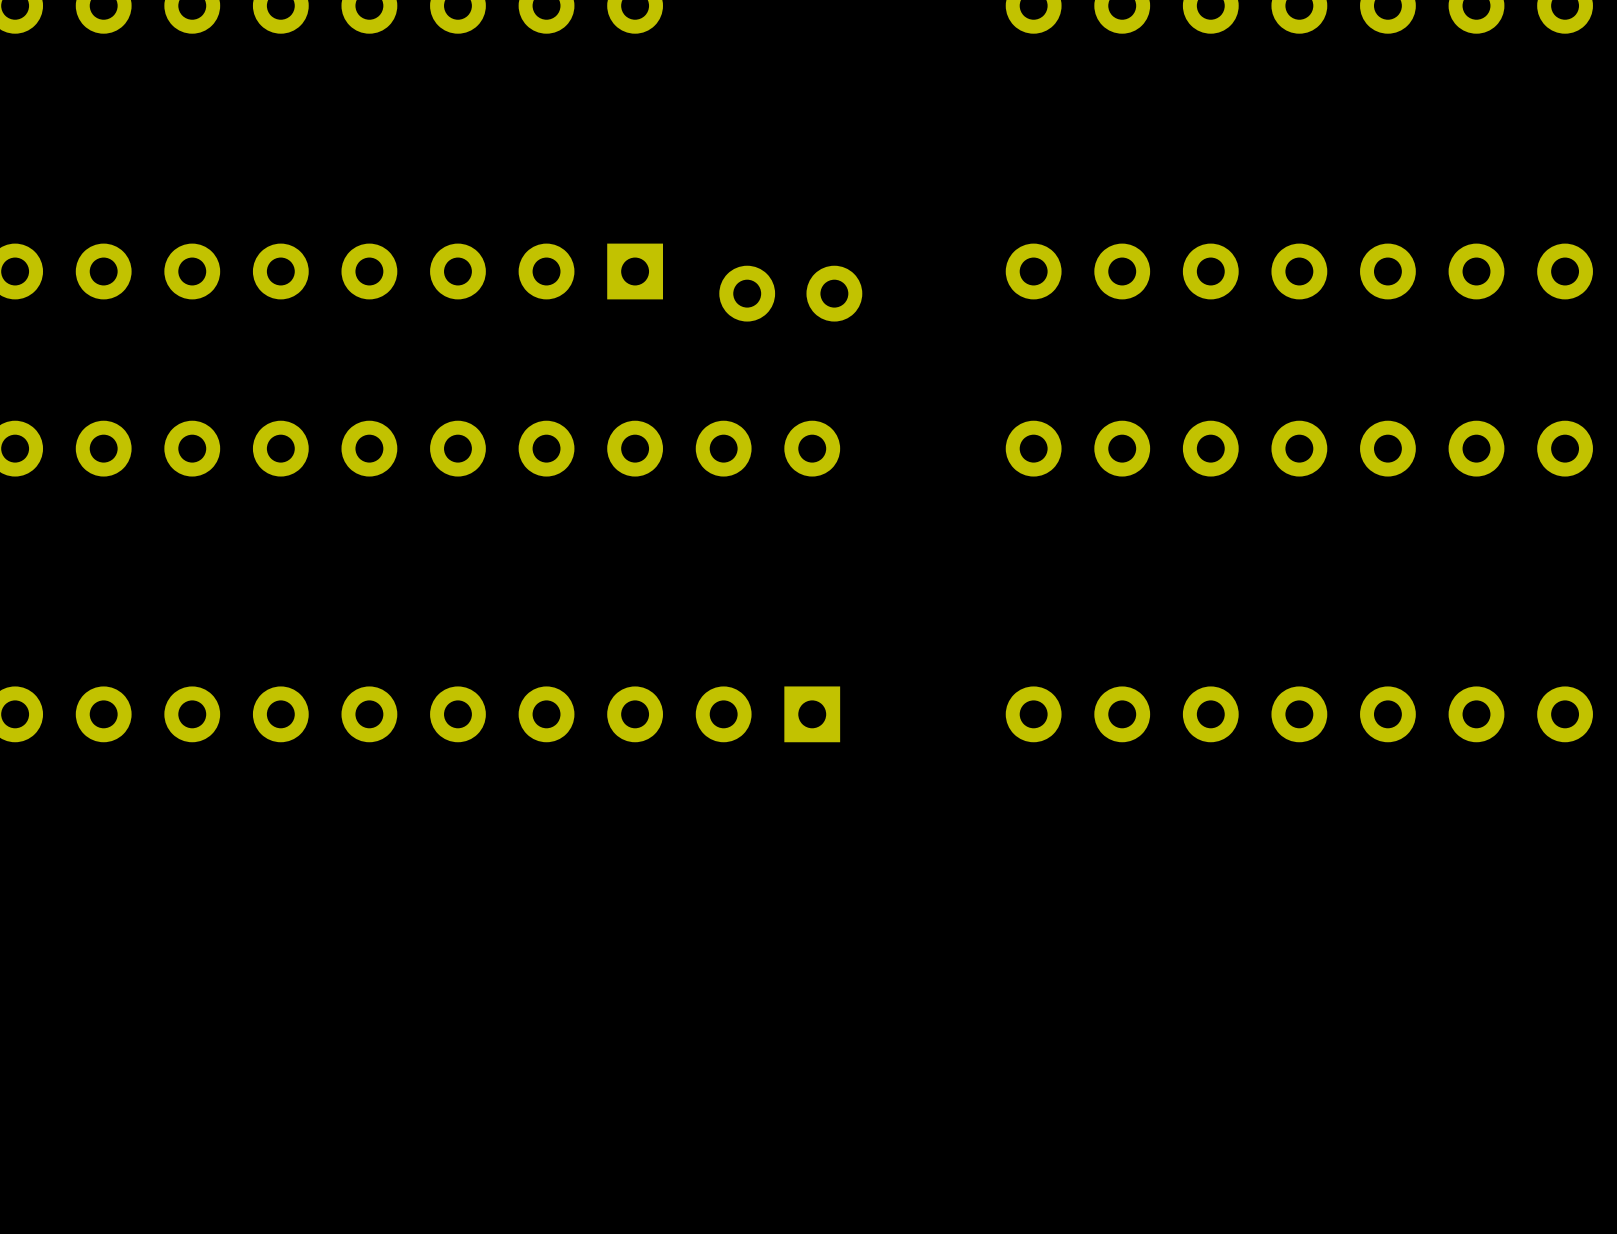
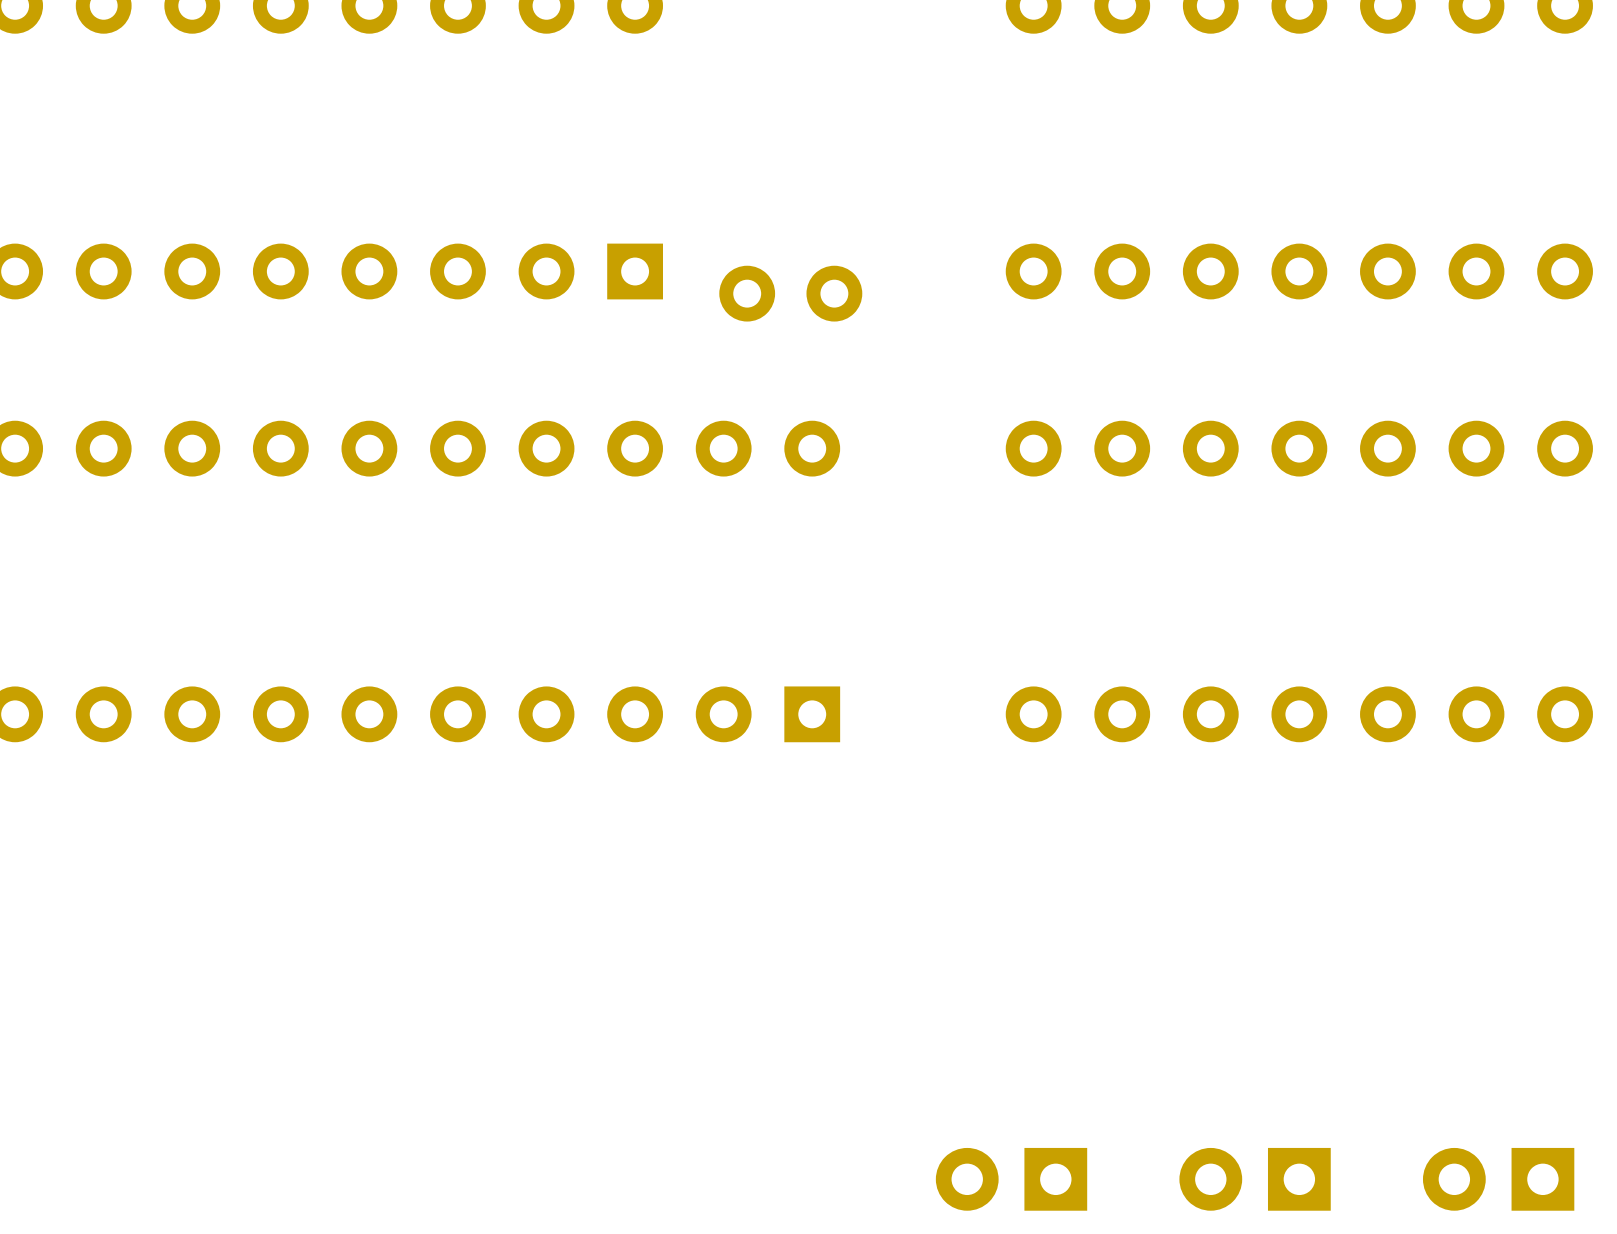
part: none -> (1011, 1179)
part: none -> (1255, 1179)
part: none -> (1498, 1179)

